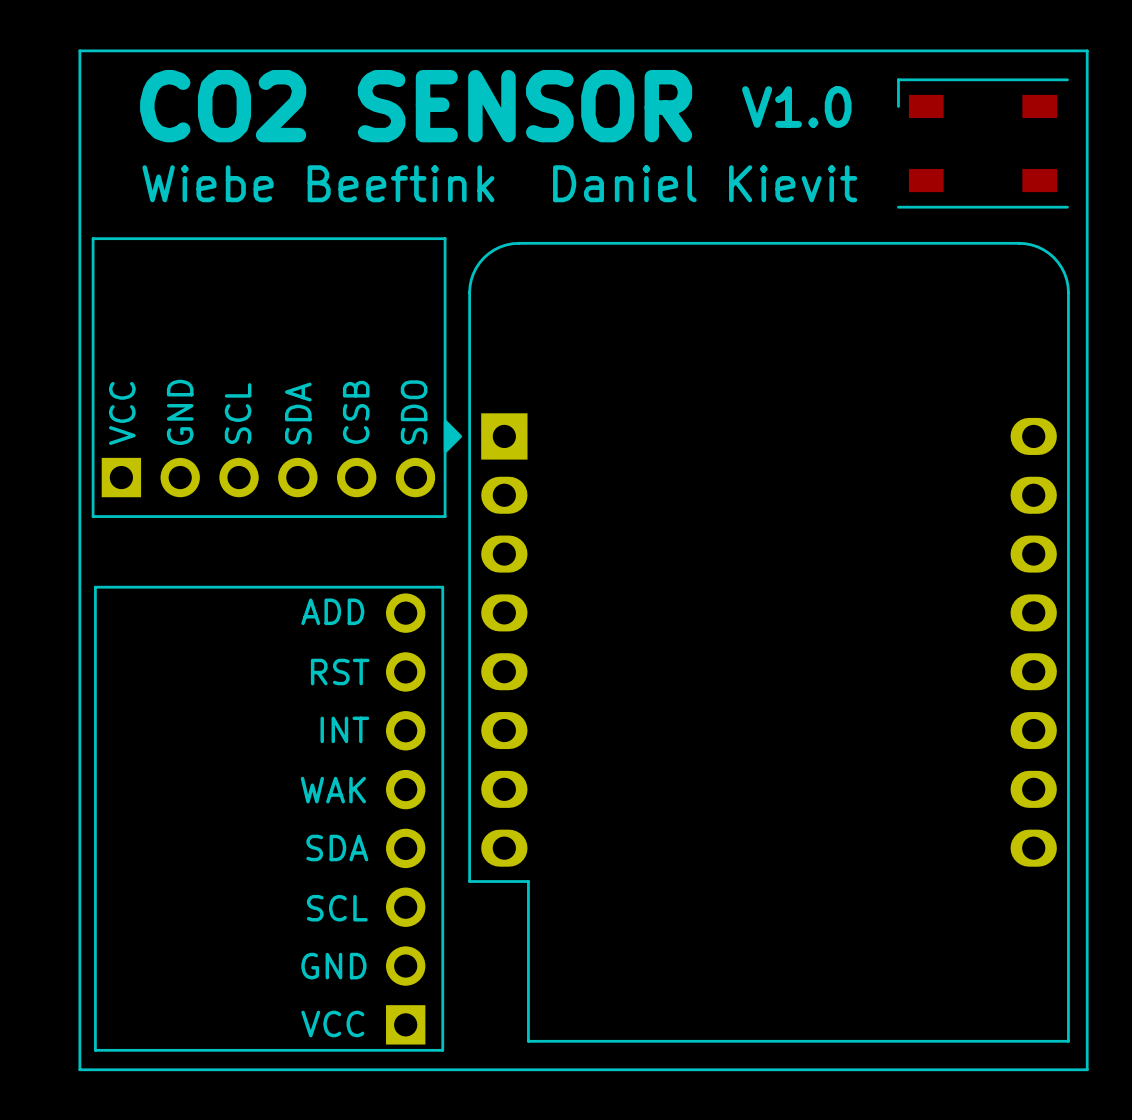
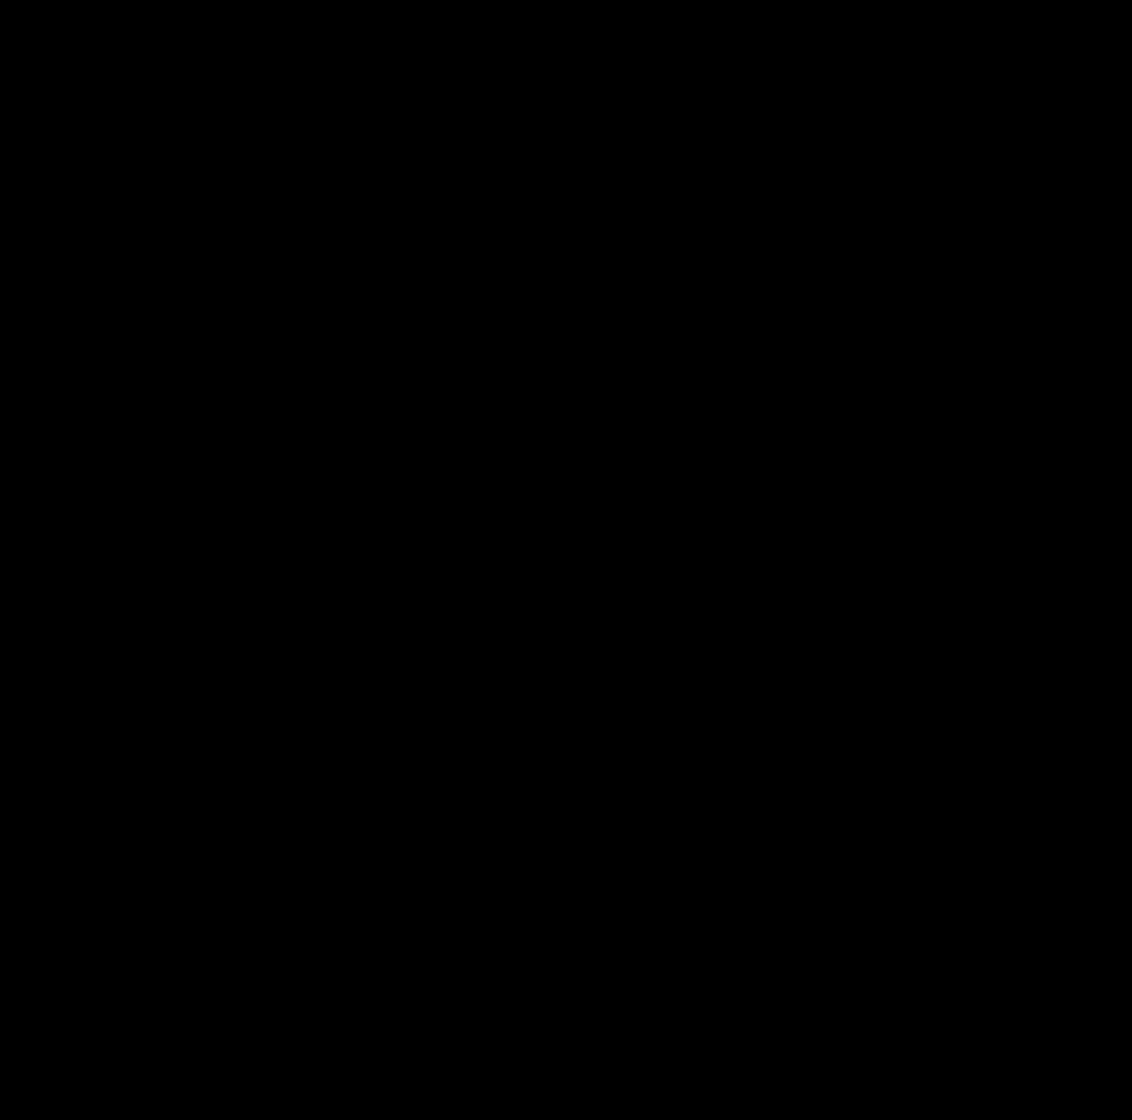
line: (79, 50) (79, 1069) (1087, 1069) (1087, 50) (79, 50) -> none
text: CO2 SENSOR (416, 106) -> none
text: V1.0 (796, 107) -> none
part: (983, 143) -> none
text: Wiebe Beeftink Daniel Kievit (499, 183) -> none
part: (269, 377) -> none
part: (756, 642) -> none
part: (269, 818) -> none

